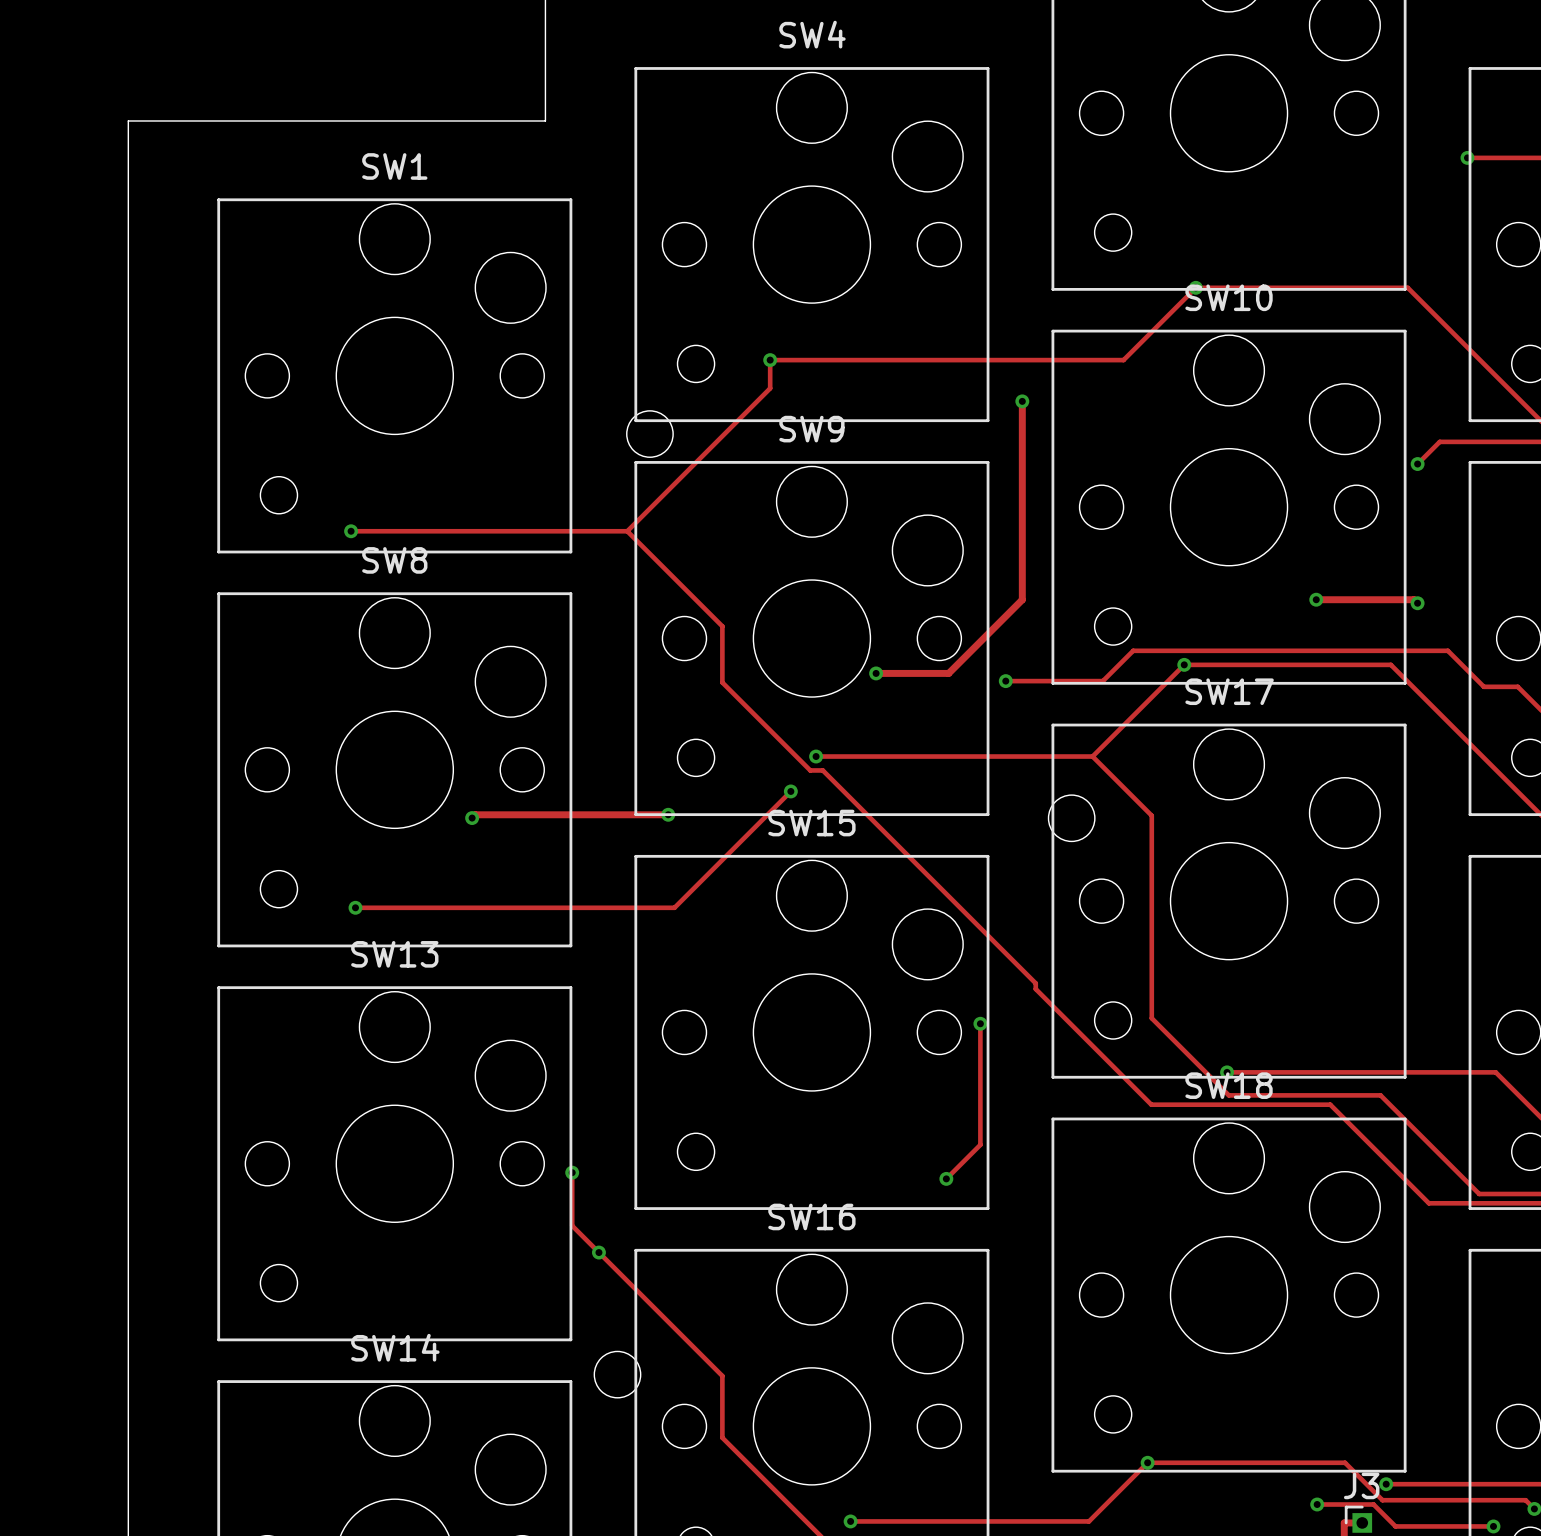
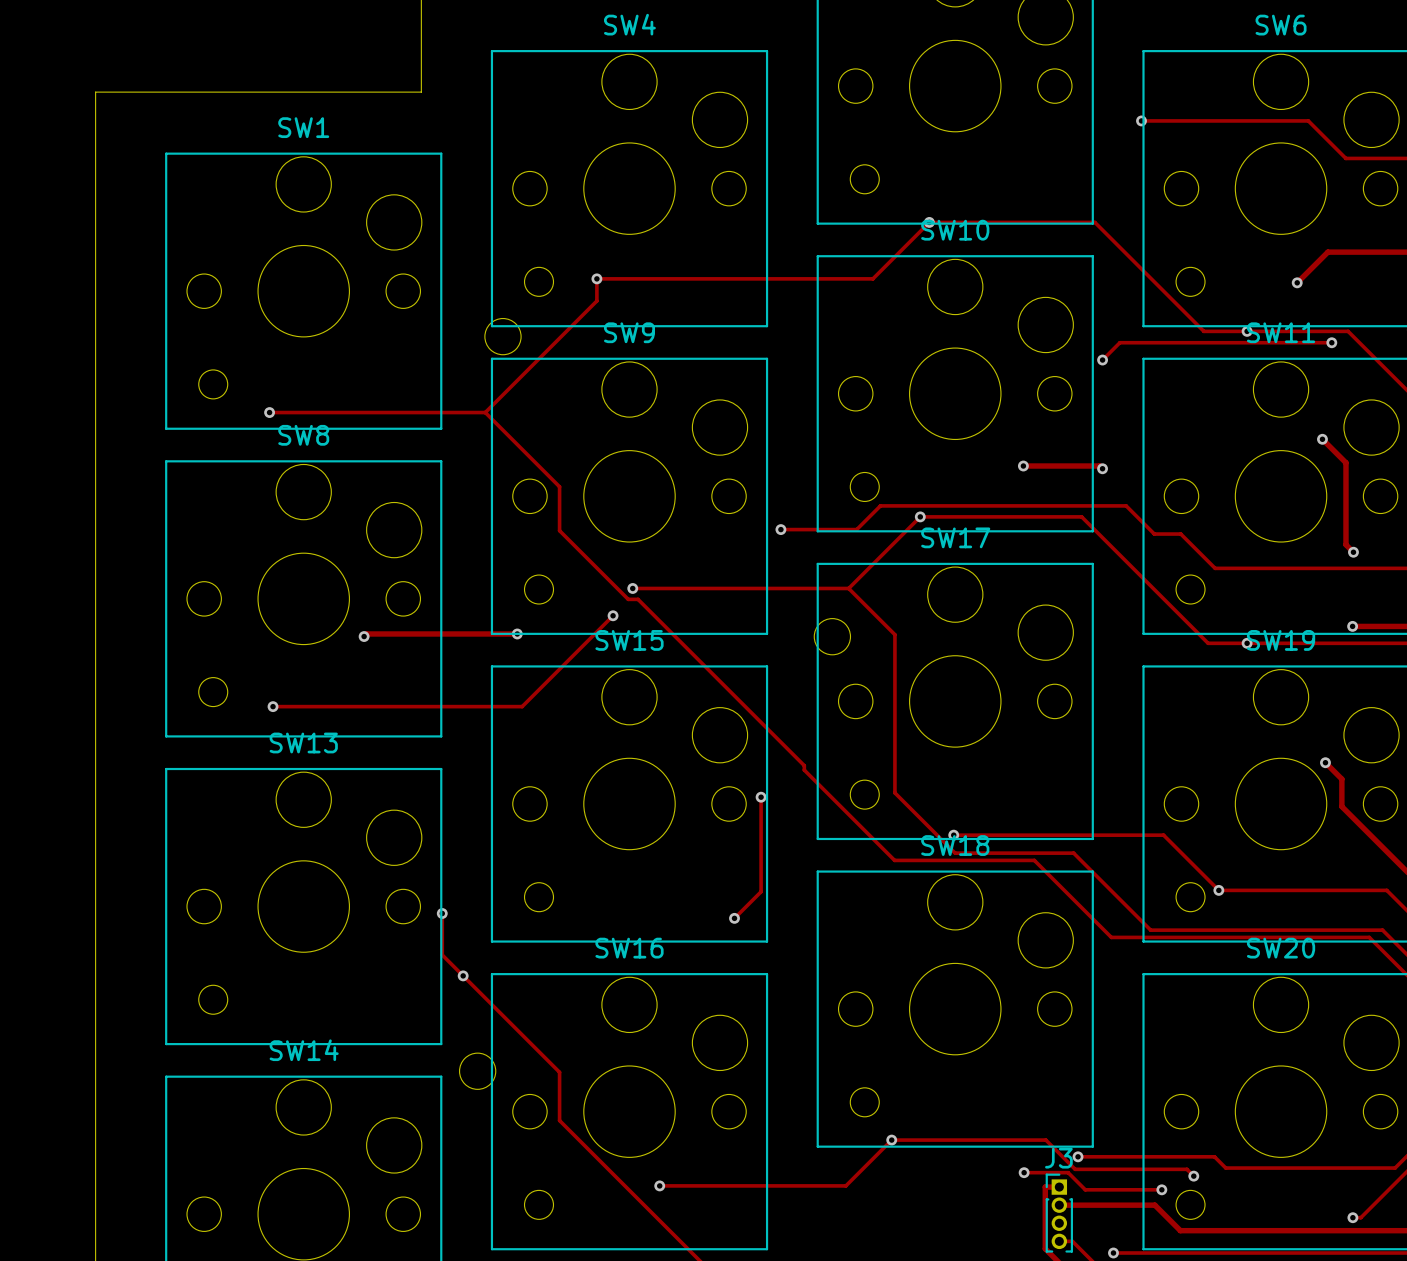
track: (1022, 401) (1022, 599) (948, 673) (876, 673) -> none
via: (1022, 401) -> none
via: (876, 673) -> none

